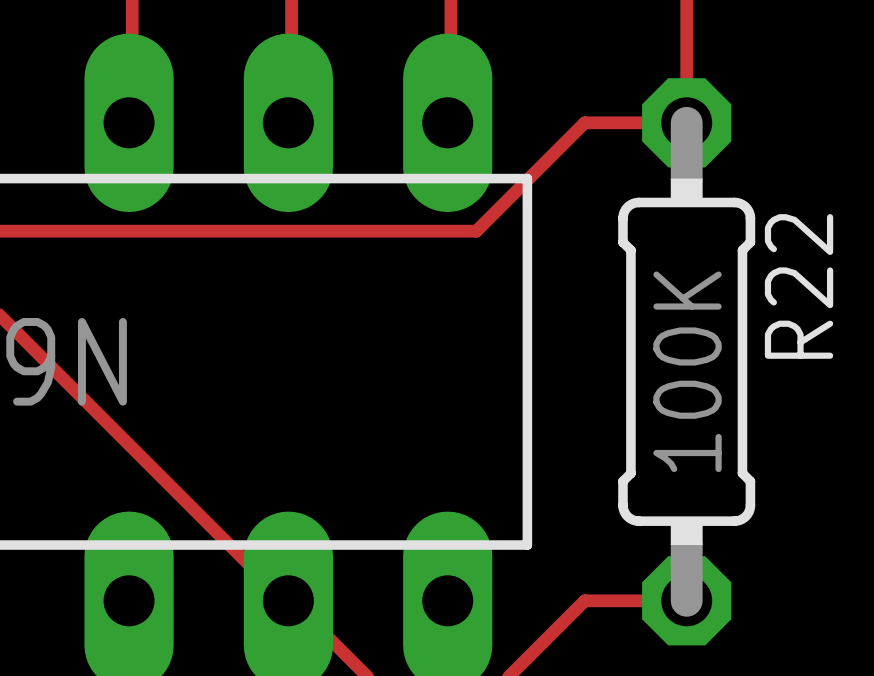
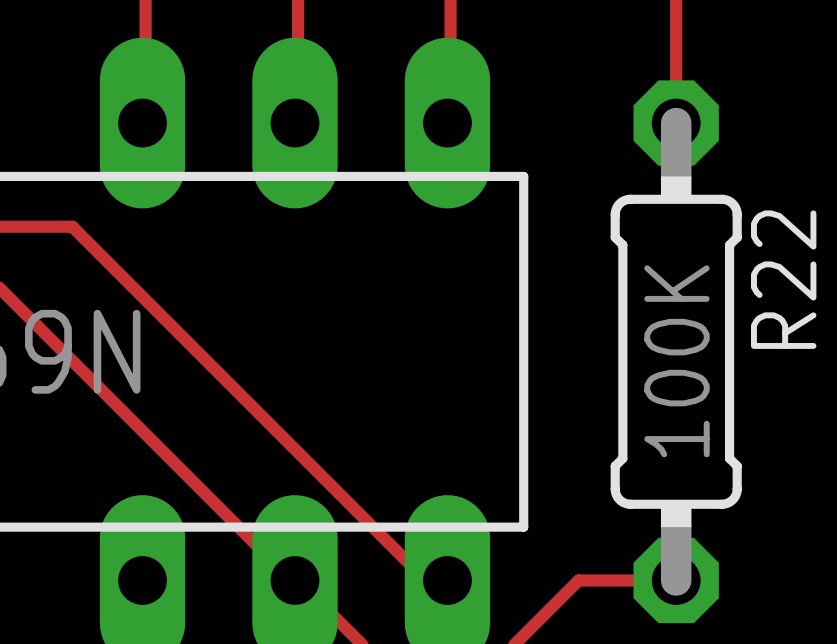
track: (686, 122) (584, 122) (476, 231) (55, 231) -> (447, 580) (426, 580) (72, 226)

